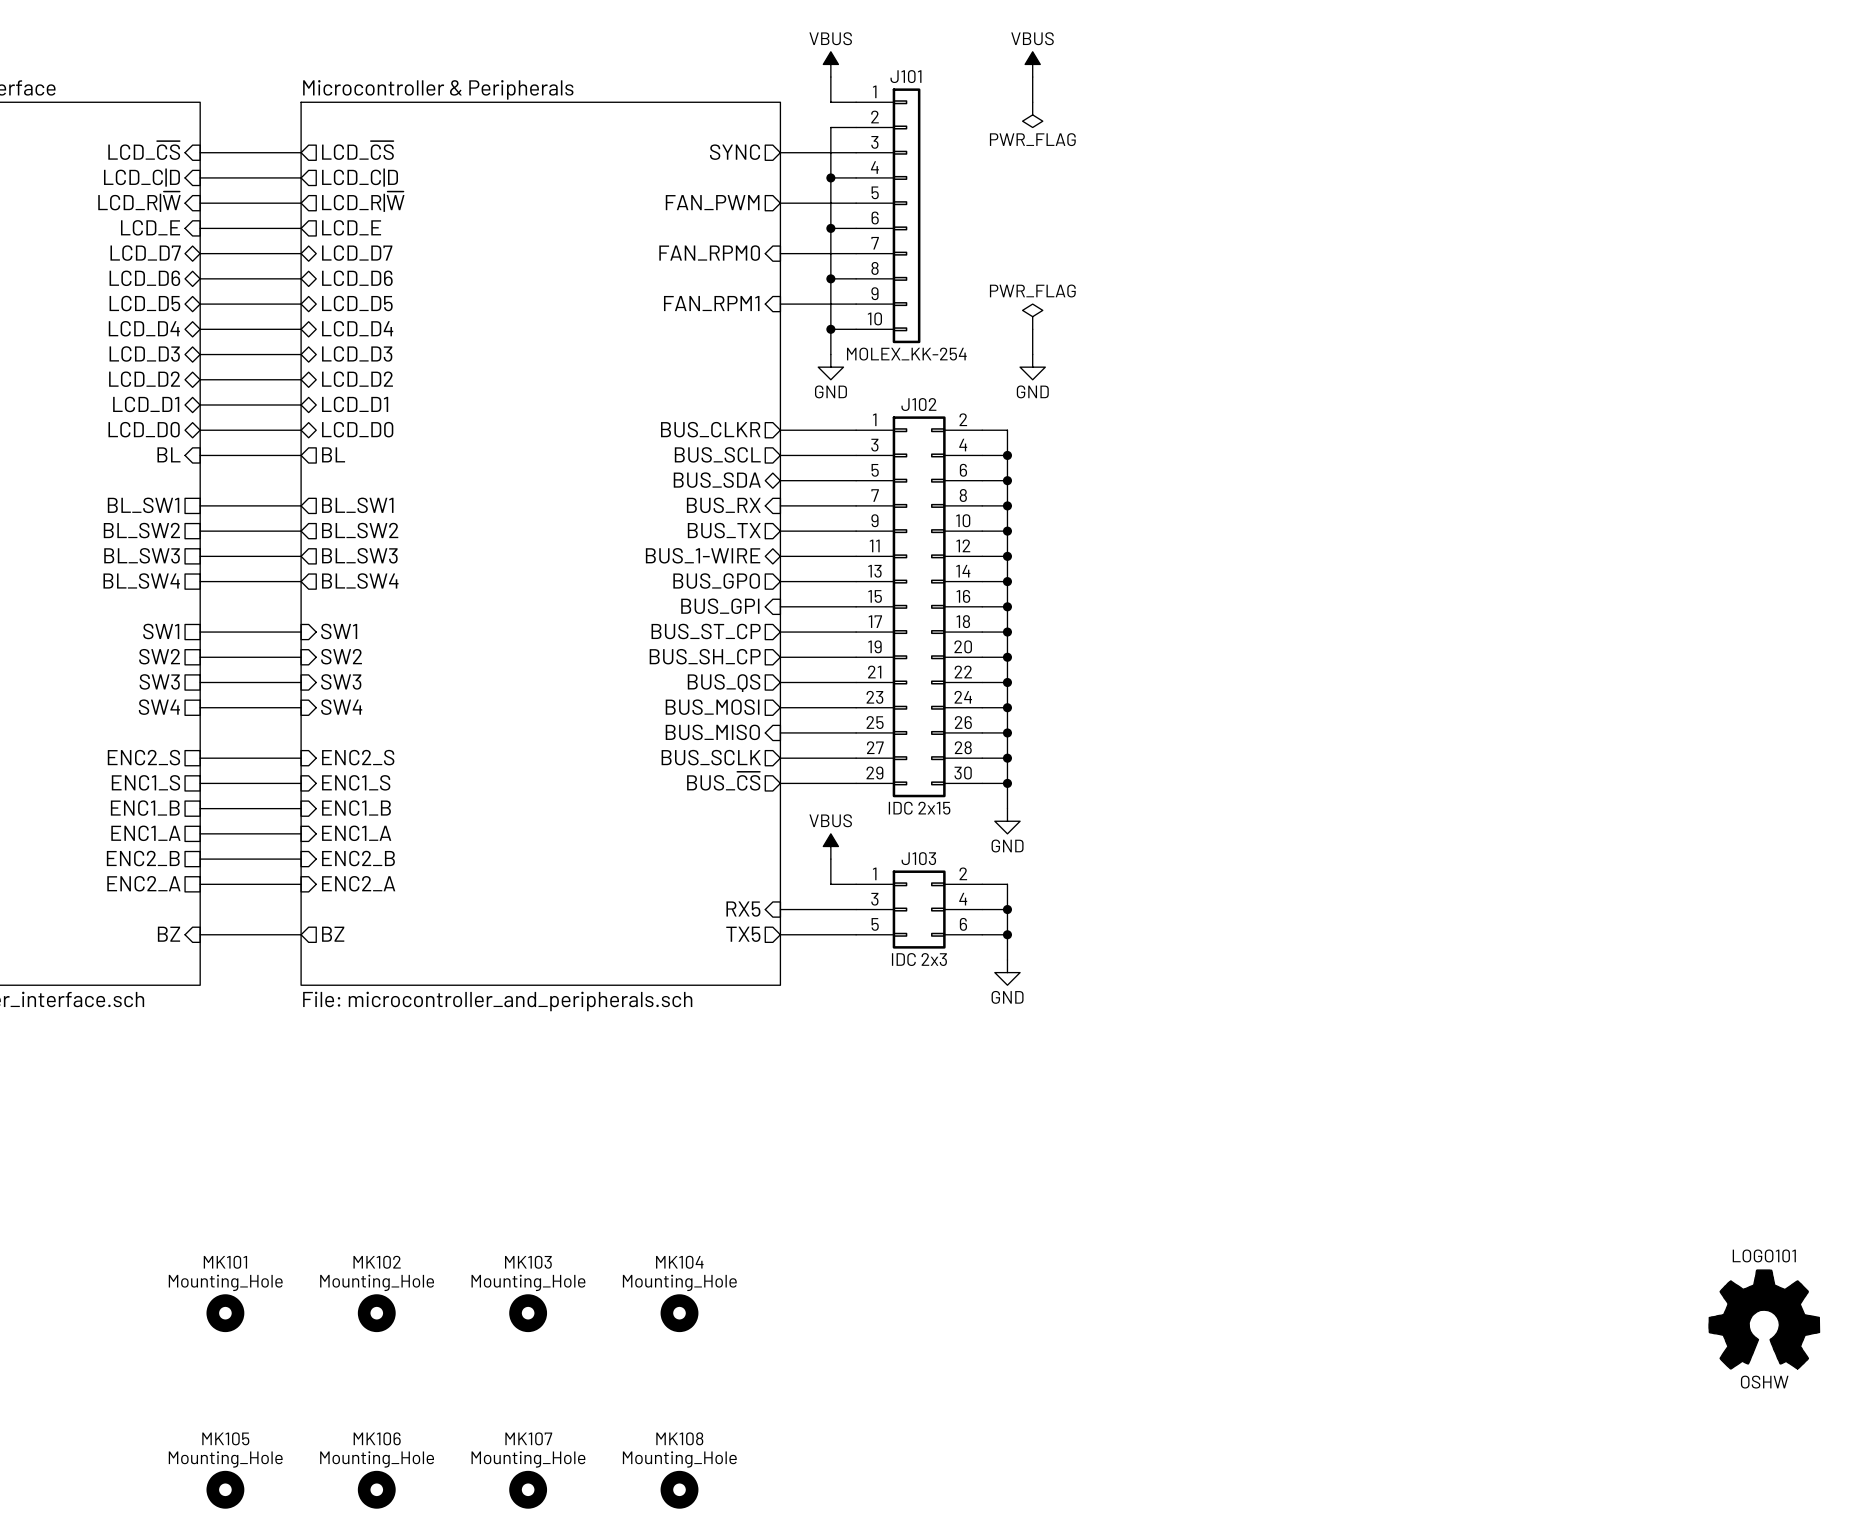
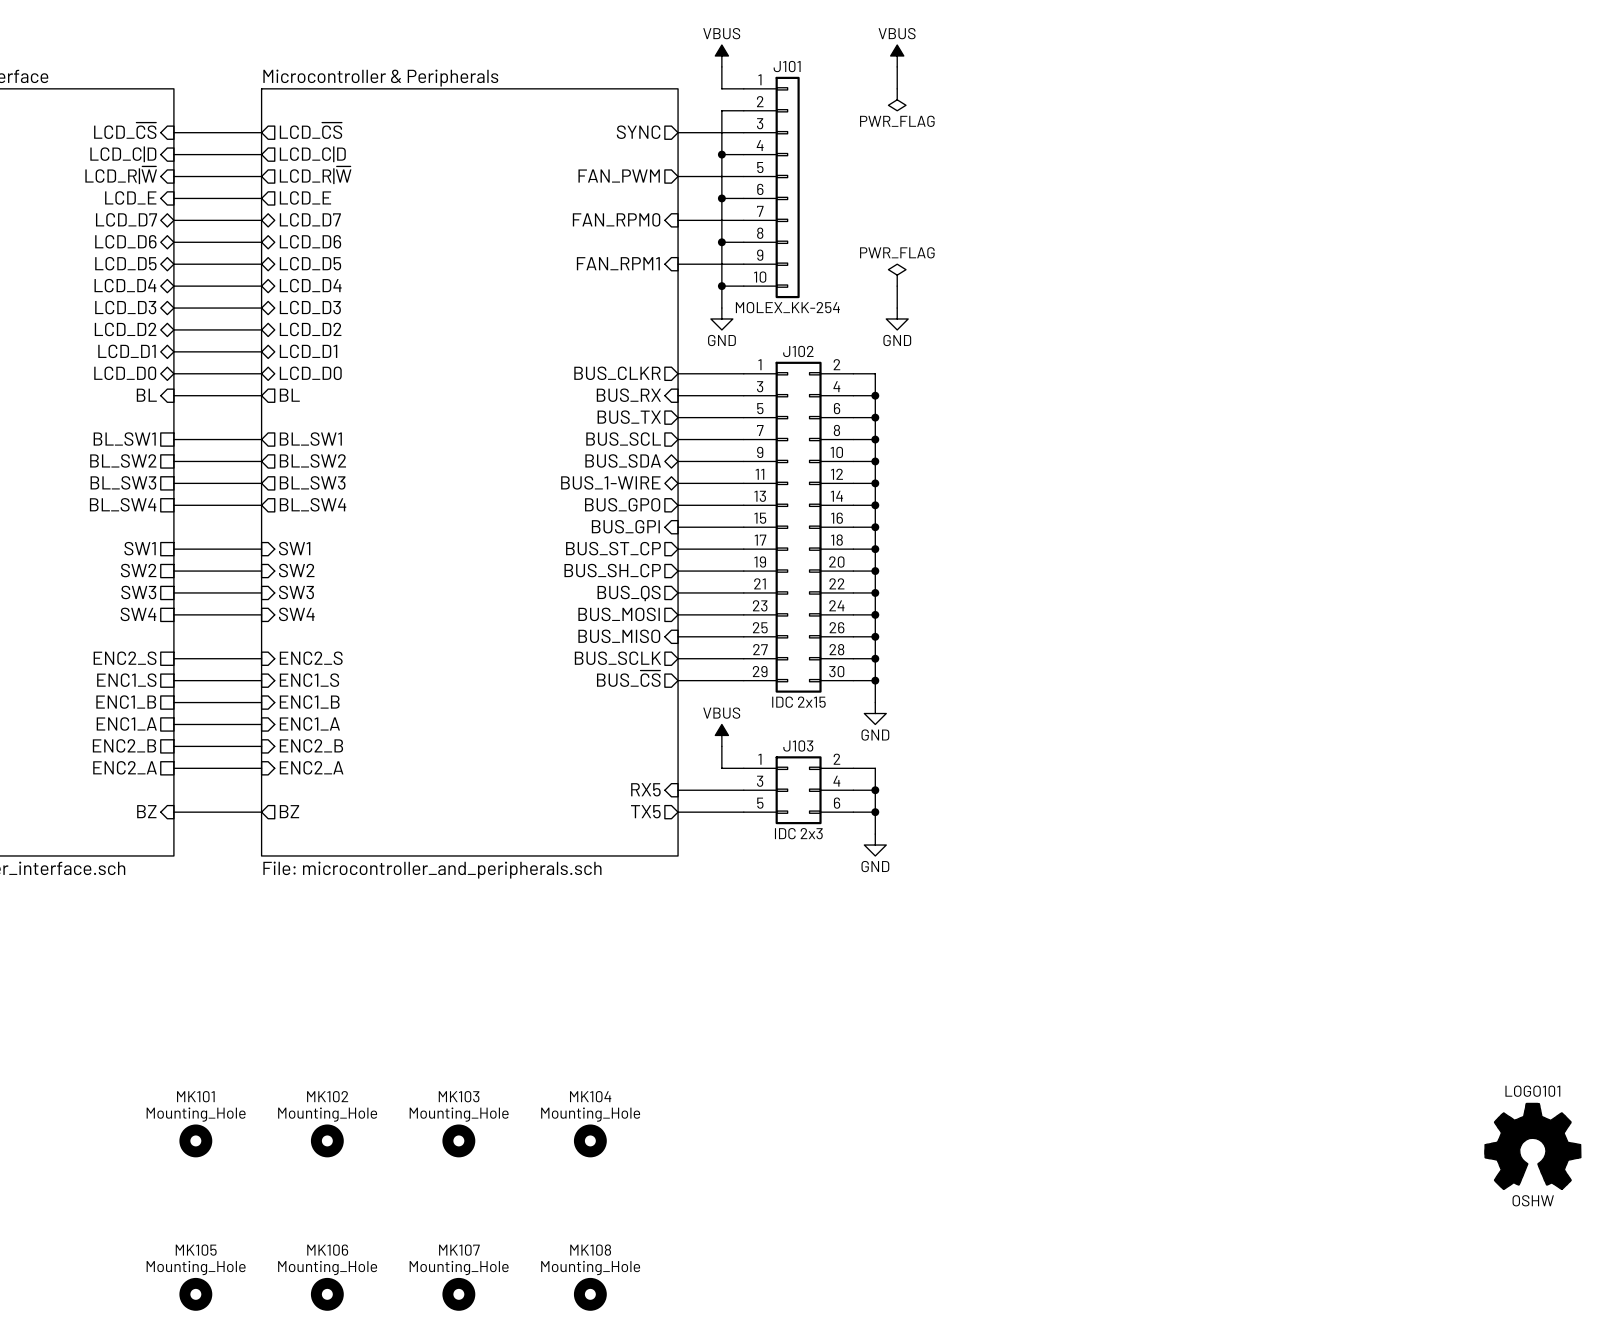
sheet pin shape: output (717, 454) -> input (628, 395)
sheet pin: BUS_SCL (717, 454) -> BUS_RX (628, 395)
sheet pin shape: bidirectional (717, 480) -> output (629, 417)
sheet pin: BUS_SDA (717, 480) -> BUS_TX (629, 417)
sheet pin shape: input (723, 505) -> output (623, 439)
sheet pin: BUS_RX (723, 505) -> BUS_SCL (623, 439)
sheet pin shape: output (724, 530) -> bidirectional (623, 460)
sheet pin: BUS_TX (724, 530) -> BUS_SDA (623, 460)

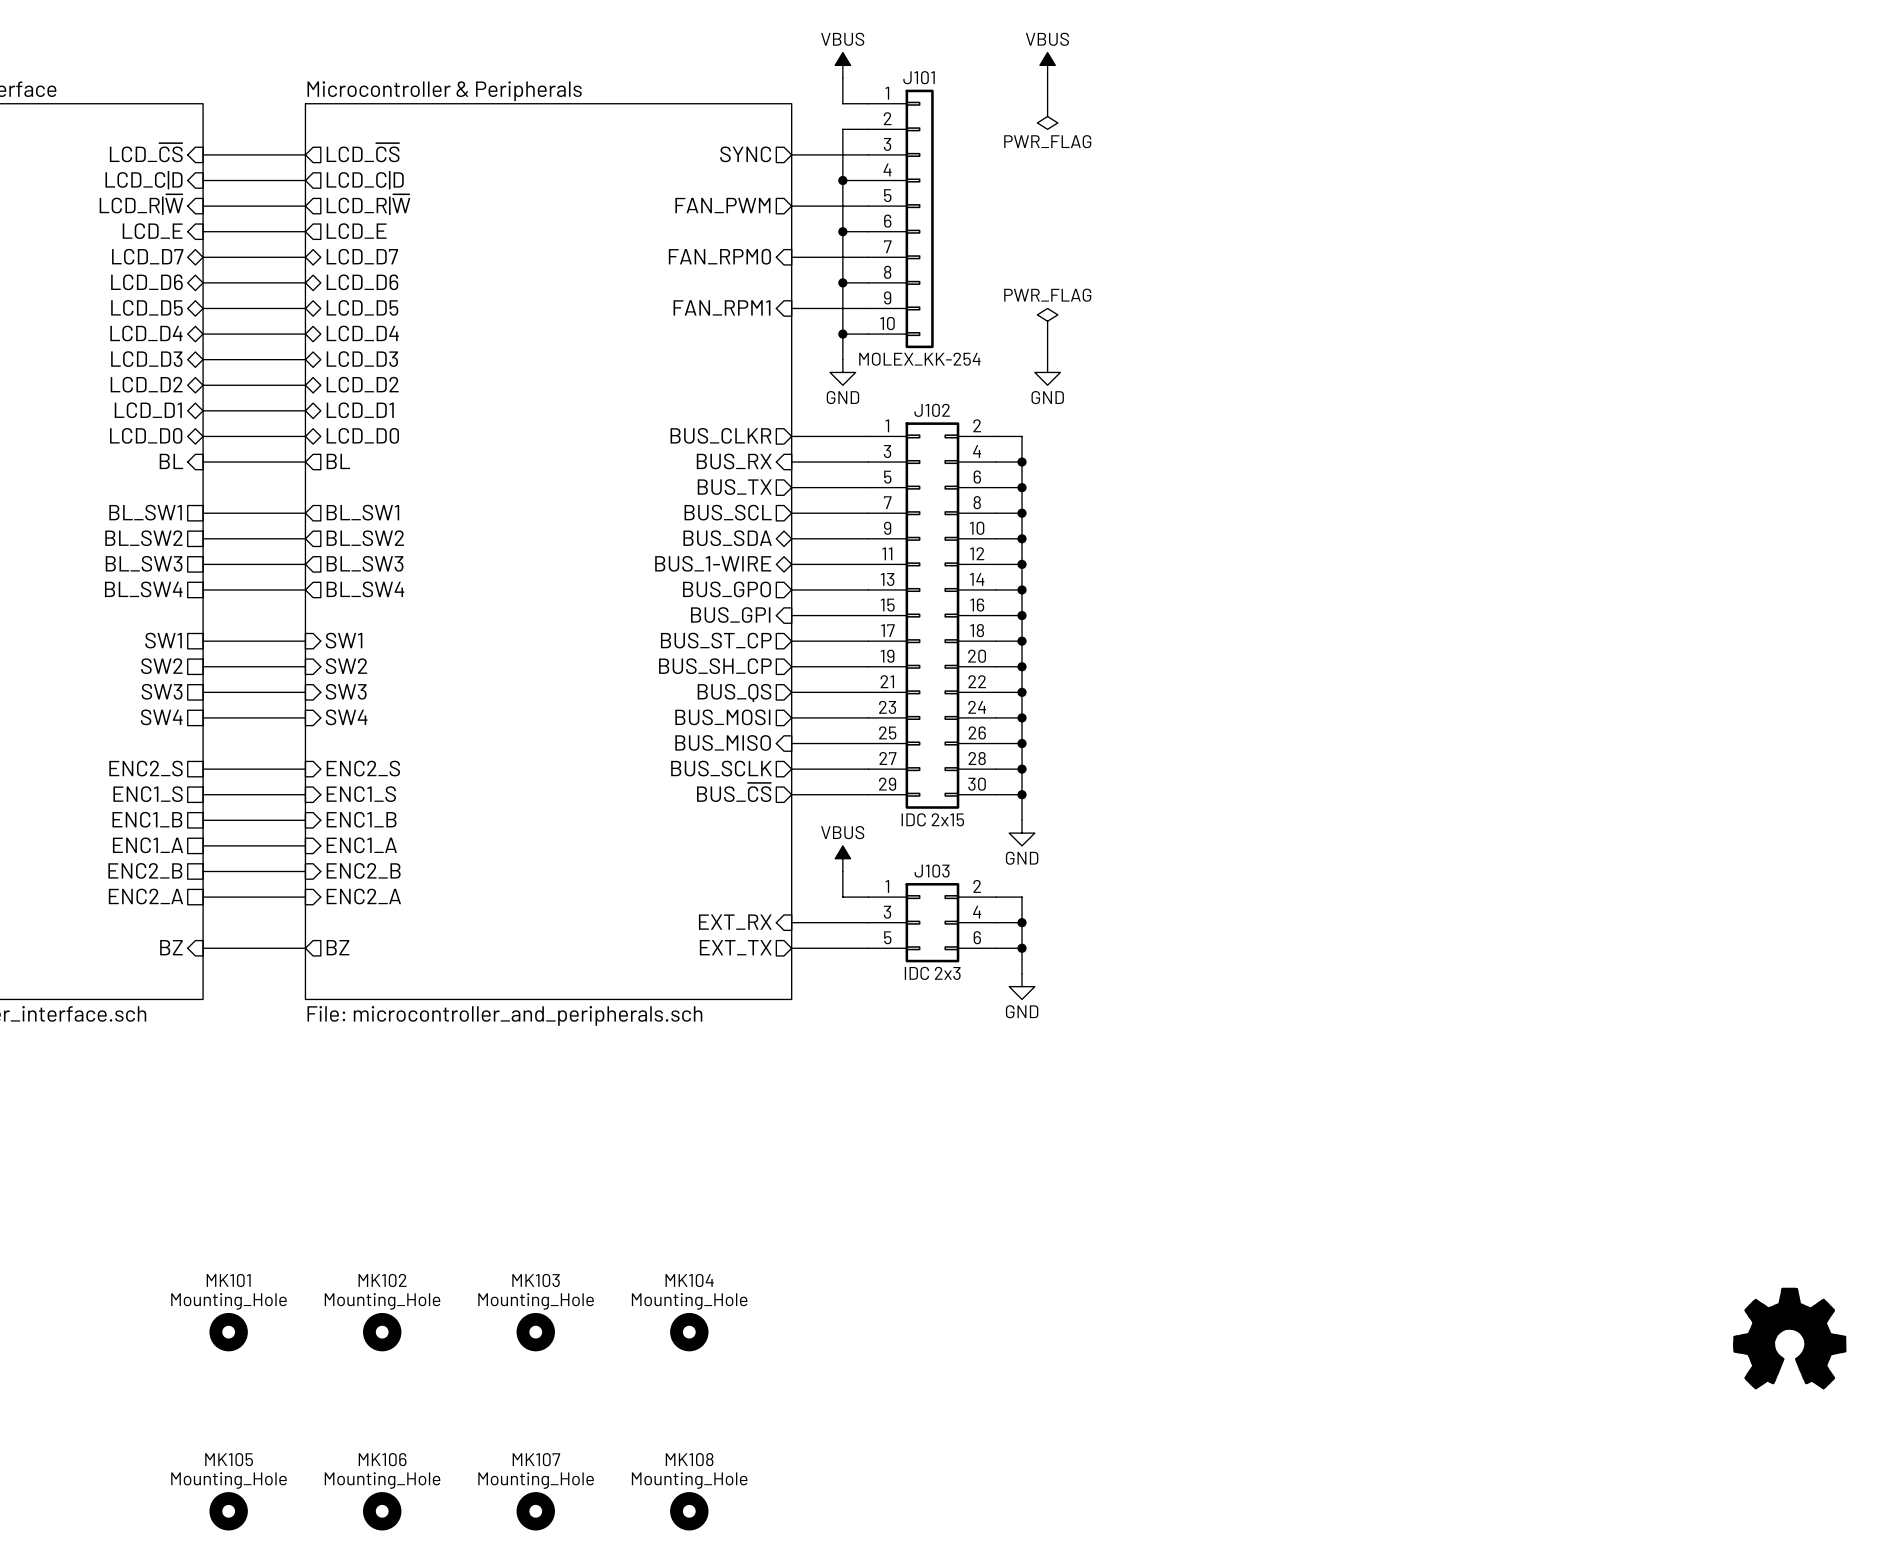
sheet pin: RX5 (645, 789) -> EXT_RX (735, 922)
sheet pin: TX5 (645, 811) -> EXT_TX (735, 947)
LOGO101 name: LOGO101 (1532, 1091) -> none
LOGO101 value: OSHW (1533, 1200) -> none

